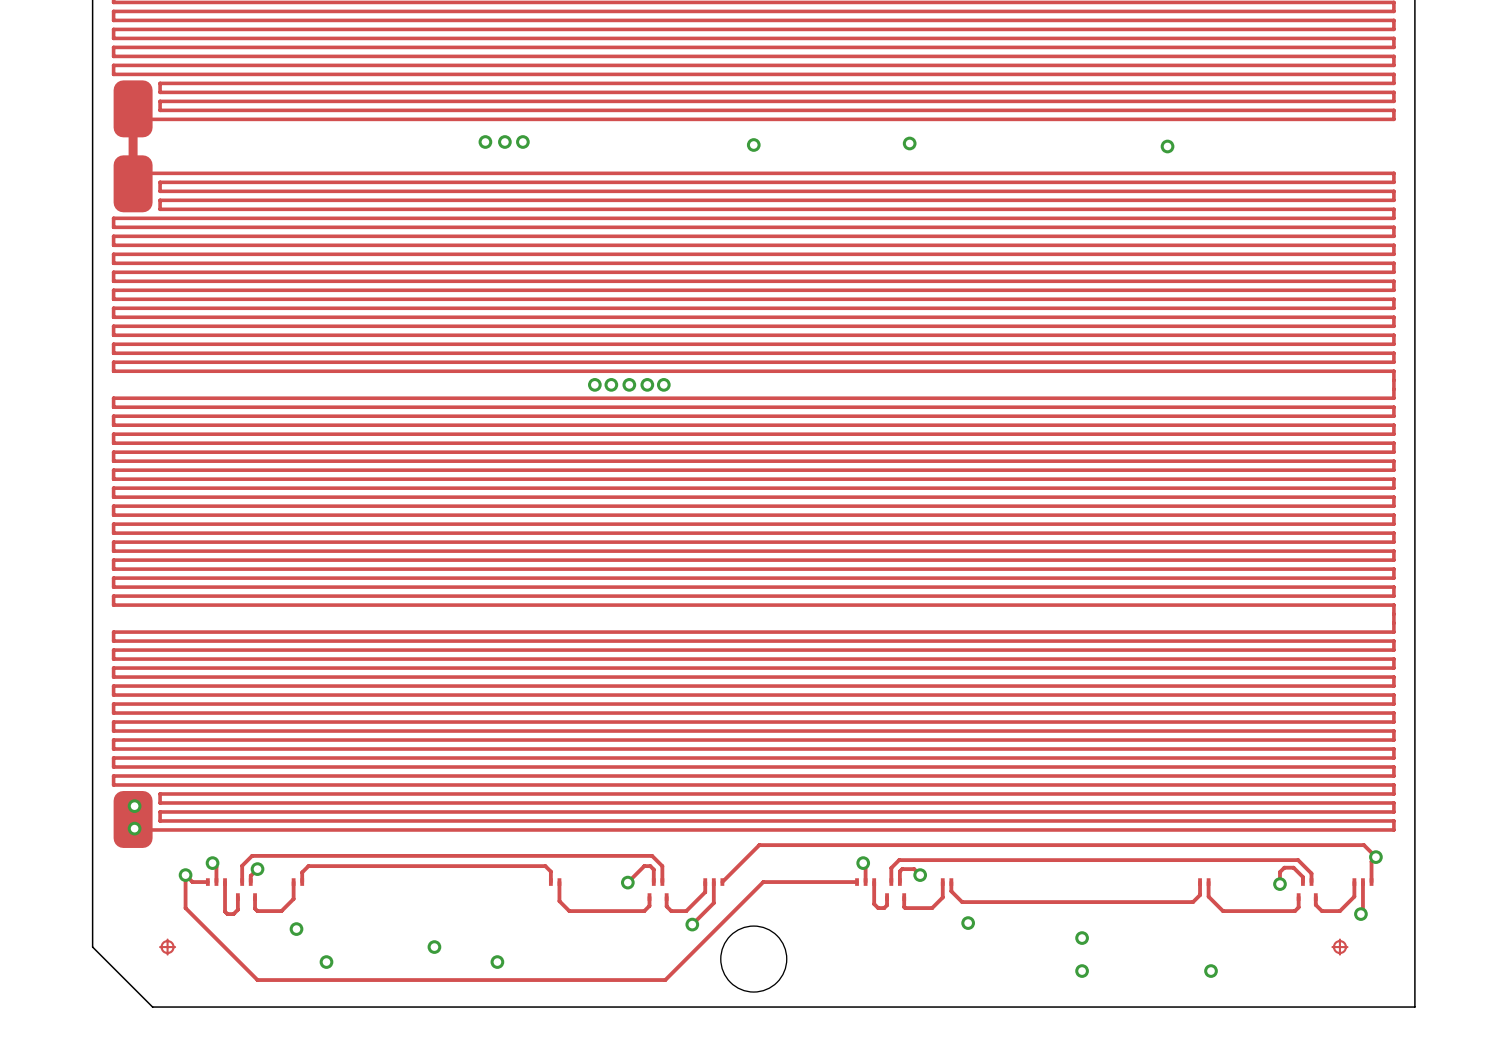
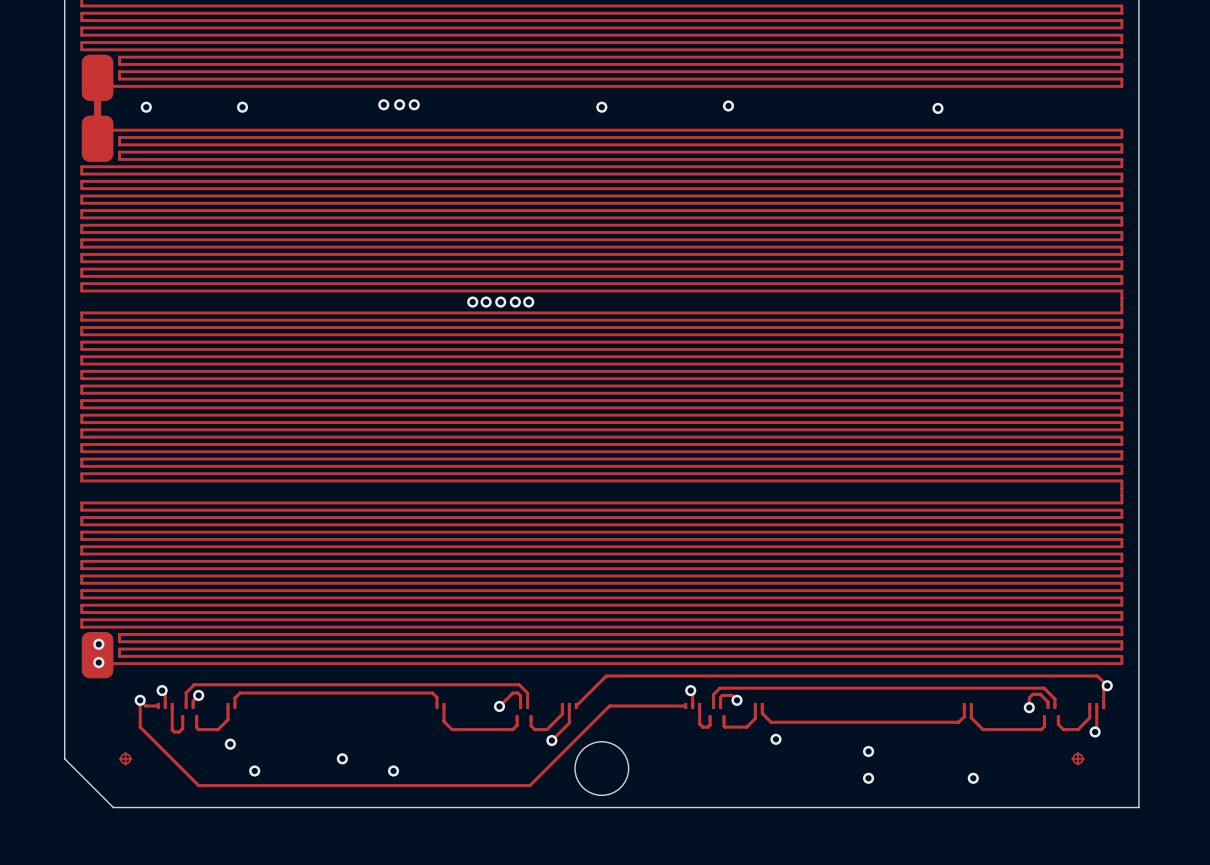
via: none -> (146, 107)
via: none -> (242, 107)

